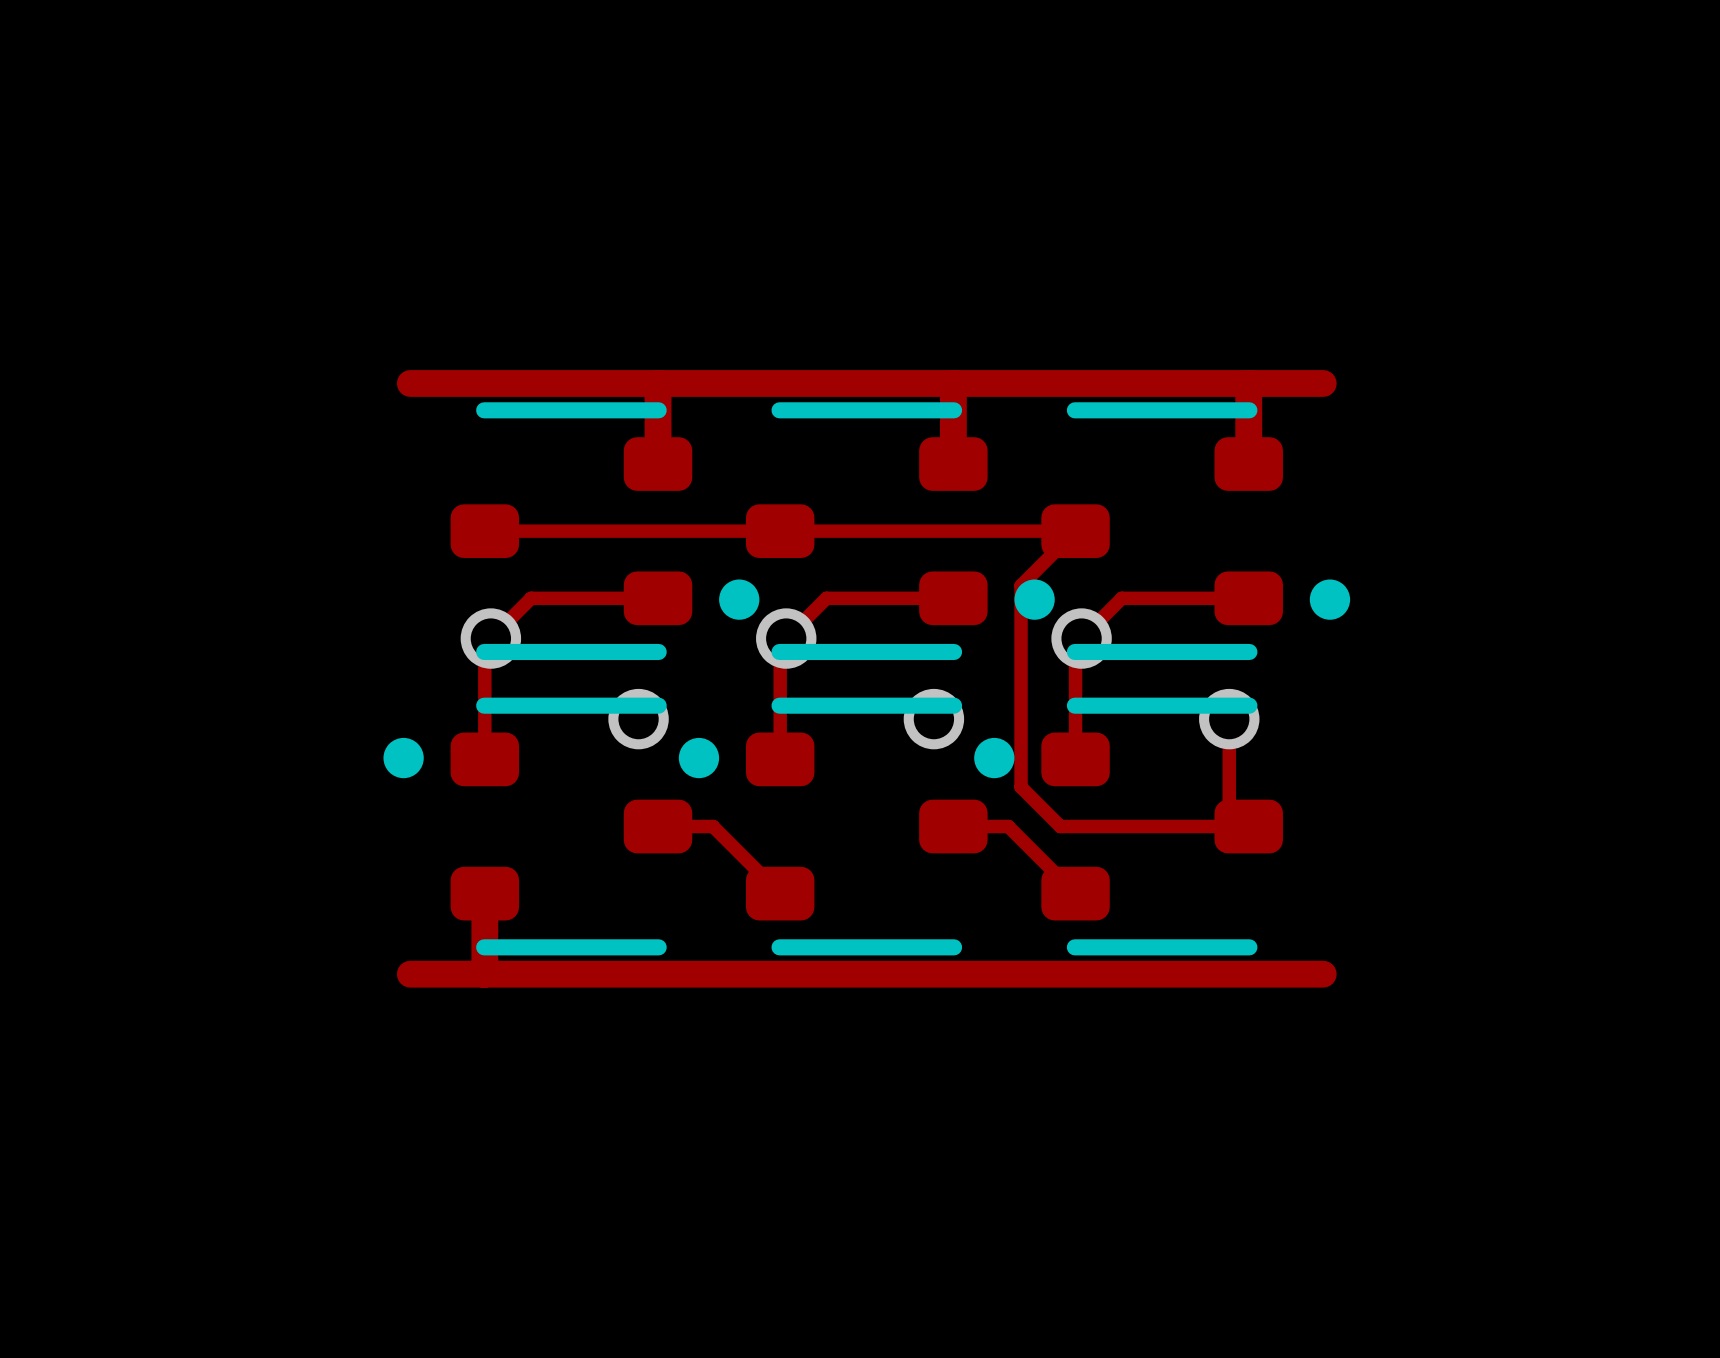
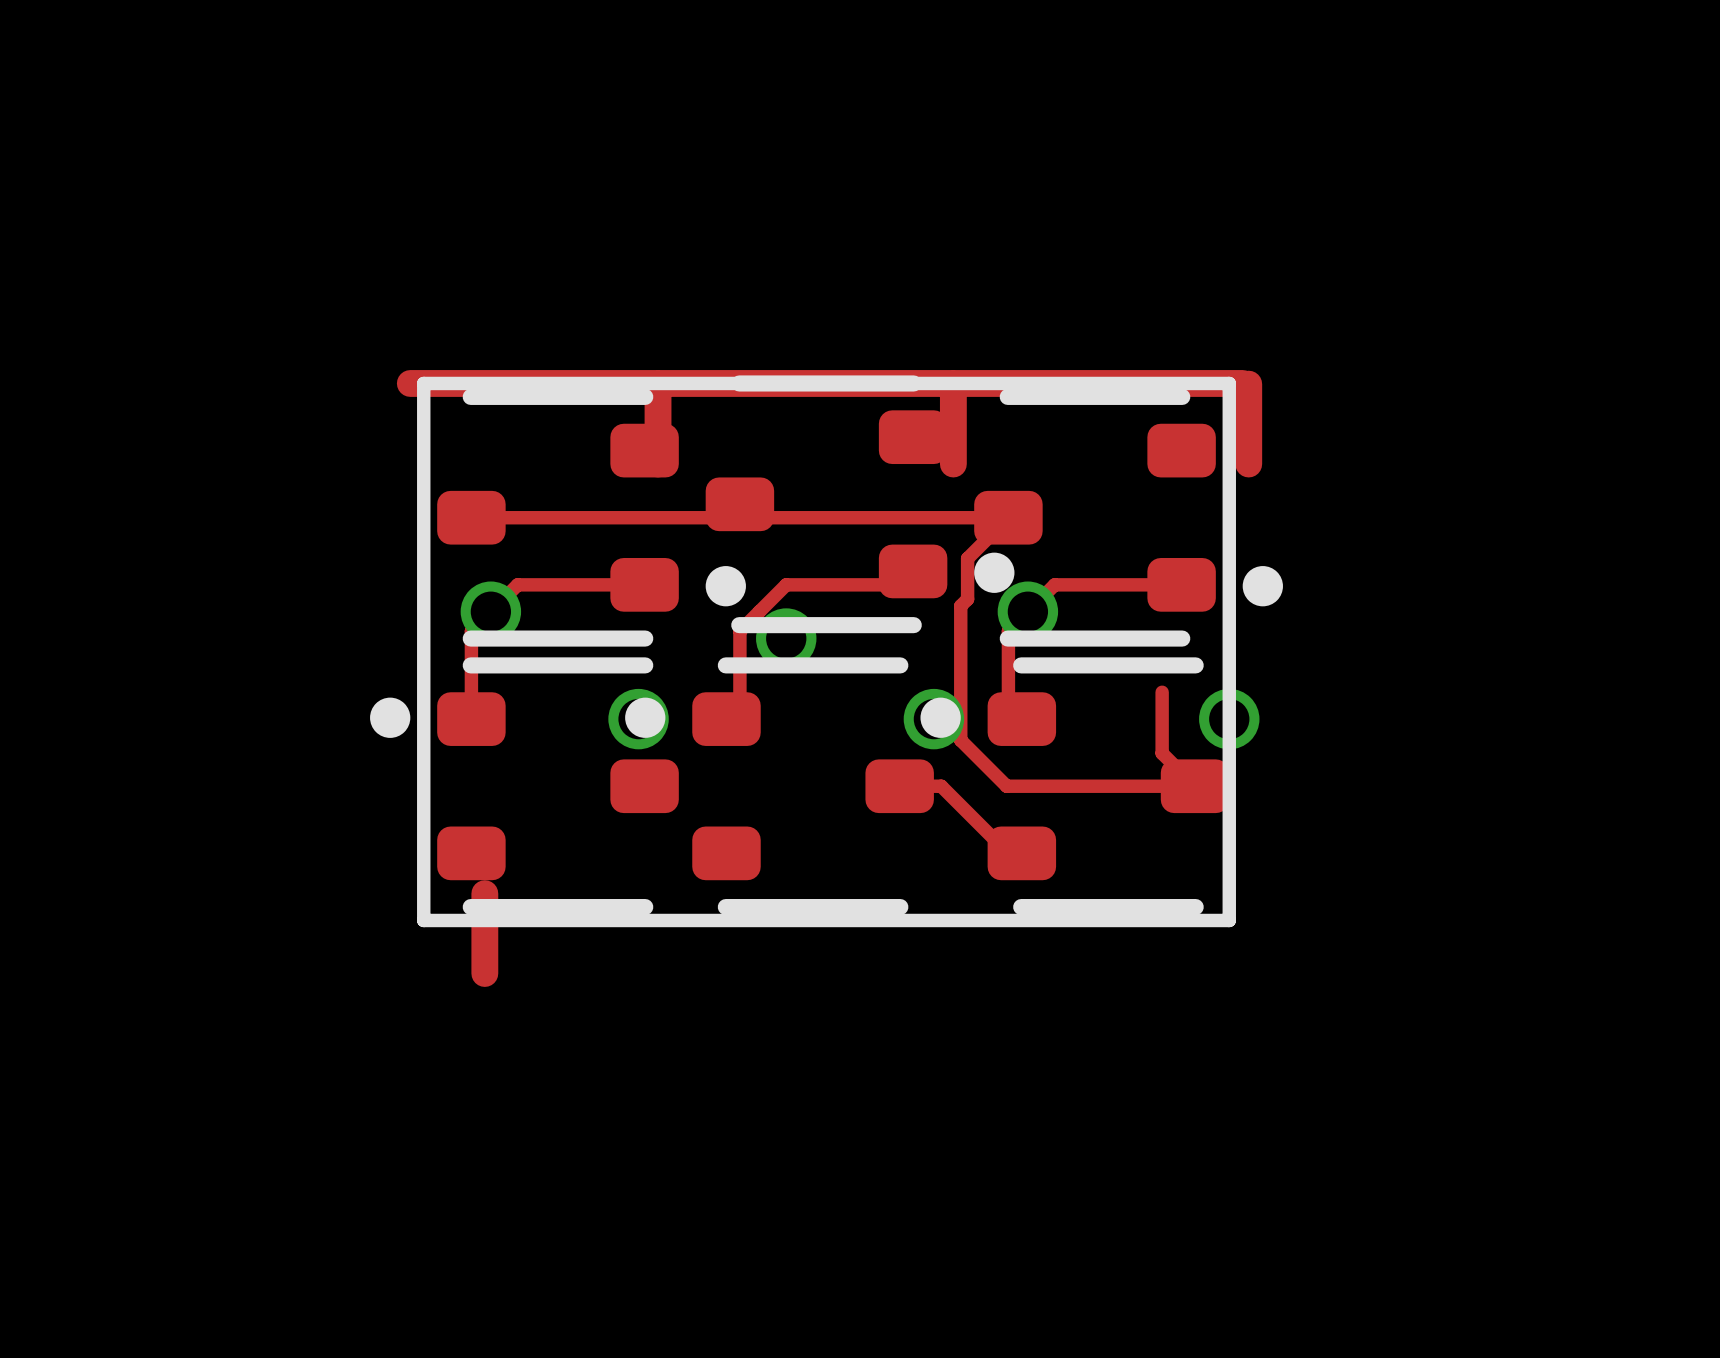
line: none -> (423, 383) (1229, 383) (1229, 920) (423, 920) (423, 383)
track: (1242, 383) (1323, 383) -> none
track: none -> (471, 517) (1008, 517) (967, 558) (967, 599) (960, 606) (960, 740) (1006, 786) (1195, 786) (1162, 753) (1162, 692)
track: (484, 531) (1075, 531) (1021, 585) (1021, 787) (1060, 826) (1248, 826) (1229, 807) (1229, 719) -> none
part position: (604, 531) -> (591, 517)
part position: (900, 531) -> (860, 504)
part position: (1195, 531) -> (1128, 517)
track: none -> (644, 584) (517, 584) (471, 631) (471, 719)
track: none -> (913, 584) (786, 584) (739, 631) (739, 719)
track: none -> (1181, 584) (1054, 584) (1008, 631) (1008, 719)
track: (658, 598) (531, 598) (484, 644) (484, 759) -> none
track: (953, 598) (826, 598) (780, 644) (780, 759) -> none
track: (1248, 598) (1121, 598) (1075, 644) (1075, 759) -> none
via position: (490, 638) -> (490, 611)
via position: (1081, 638) -> (1027, 611)
track: none -> (899, 786) (941, 786) (1008, 853)
part position: (537, 826) -> (524, 786)
track: (658, 826) (713, 826) (780, 893) -> none
part position: (833, 826) -> (779, 786)
track: (953, 826) (1008, 826) (1075, 893) -> none
part position: (1128, 826) -> (1074, 786)
track: (410, 974) (1323, 974) -> none

